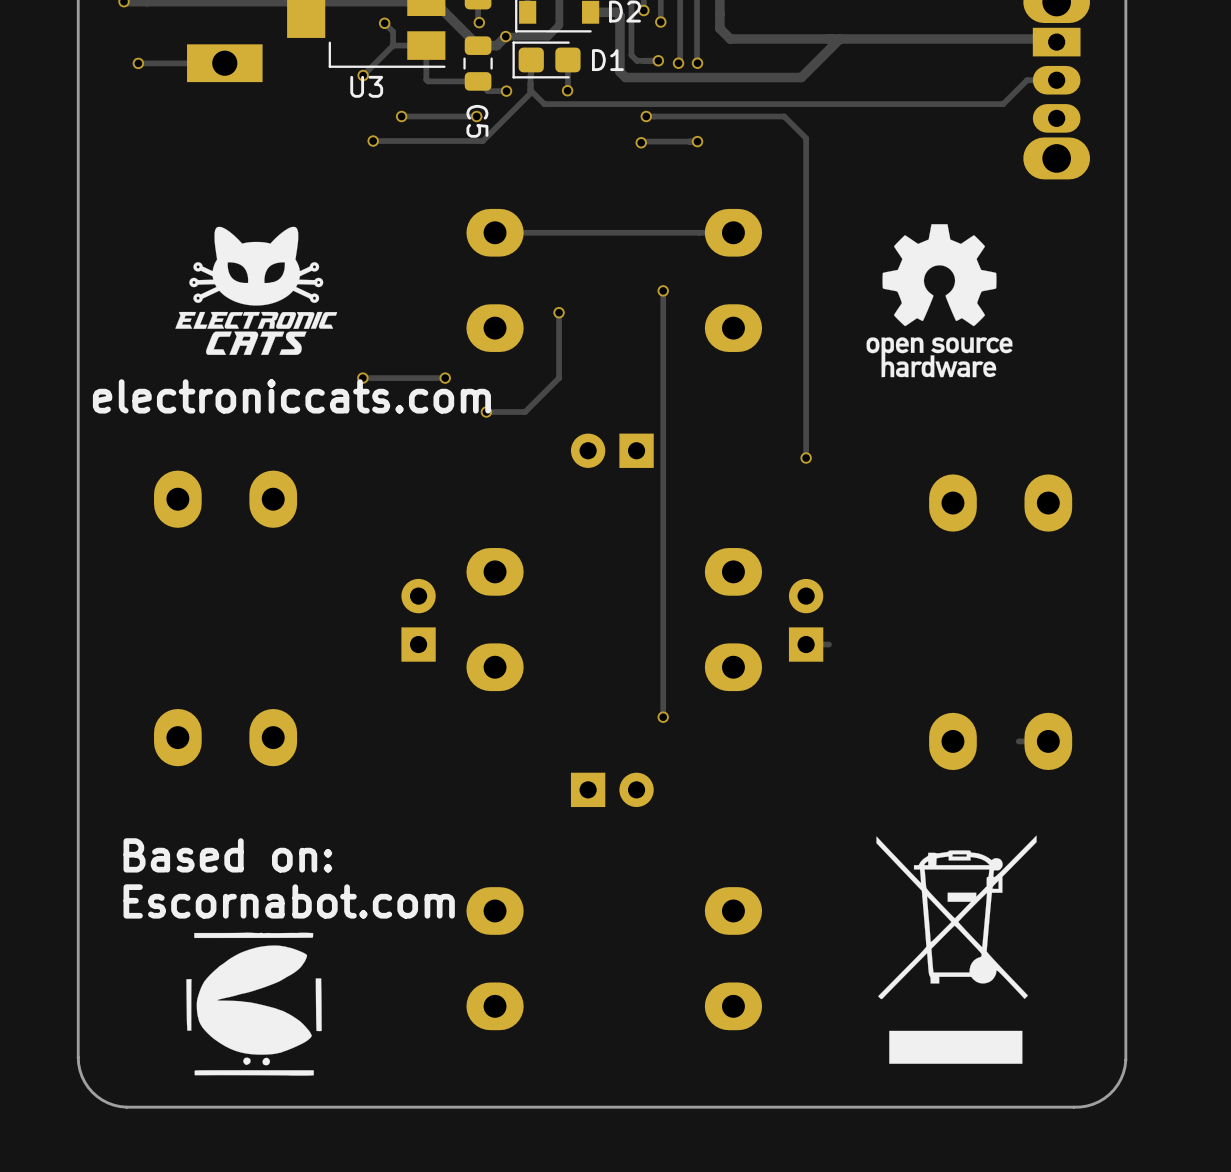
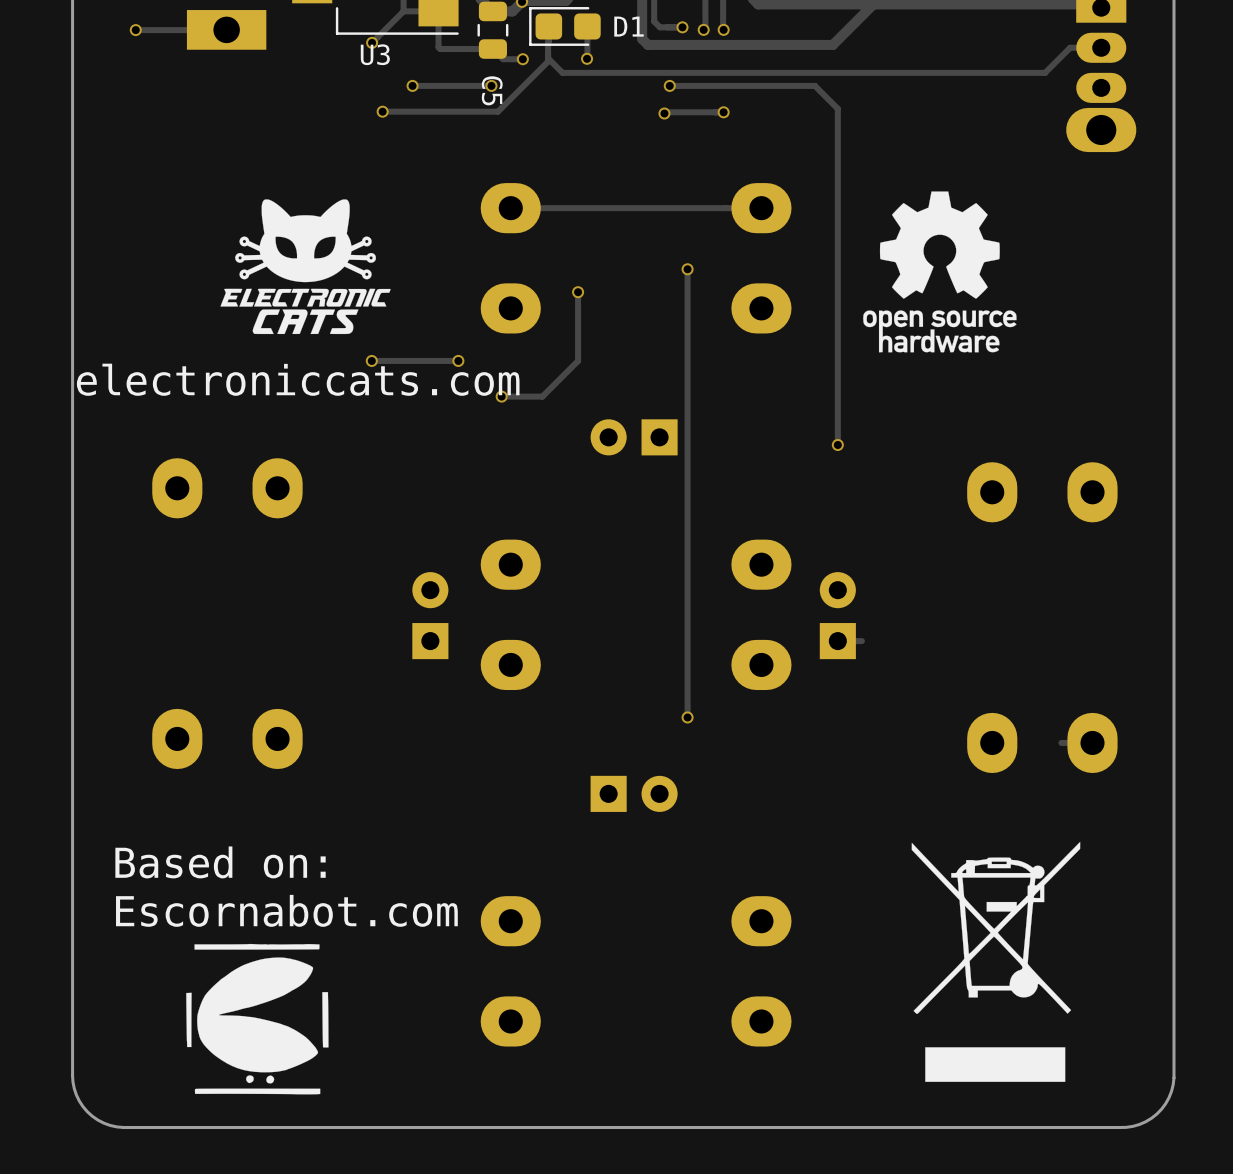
drawing position: (256, 290) -> (305, 266)
drawing position: (939, 300) -> (939, 271)

